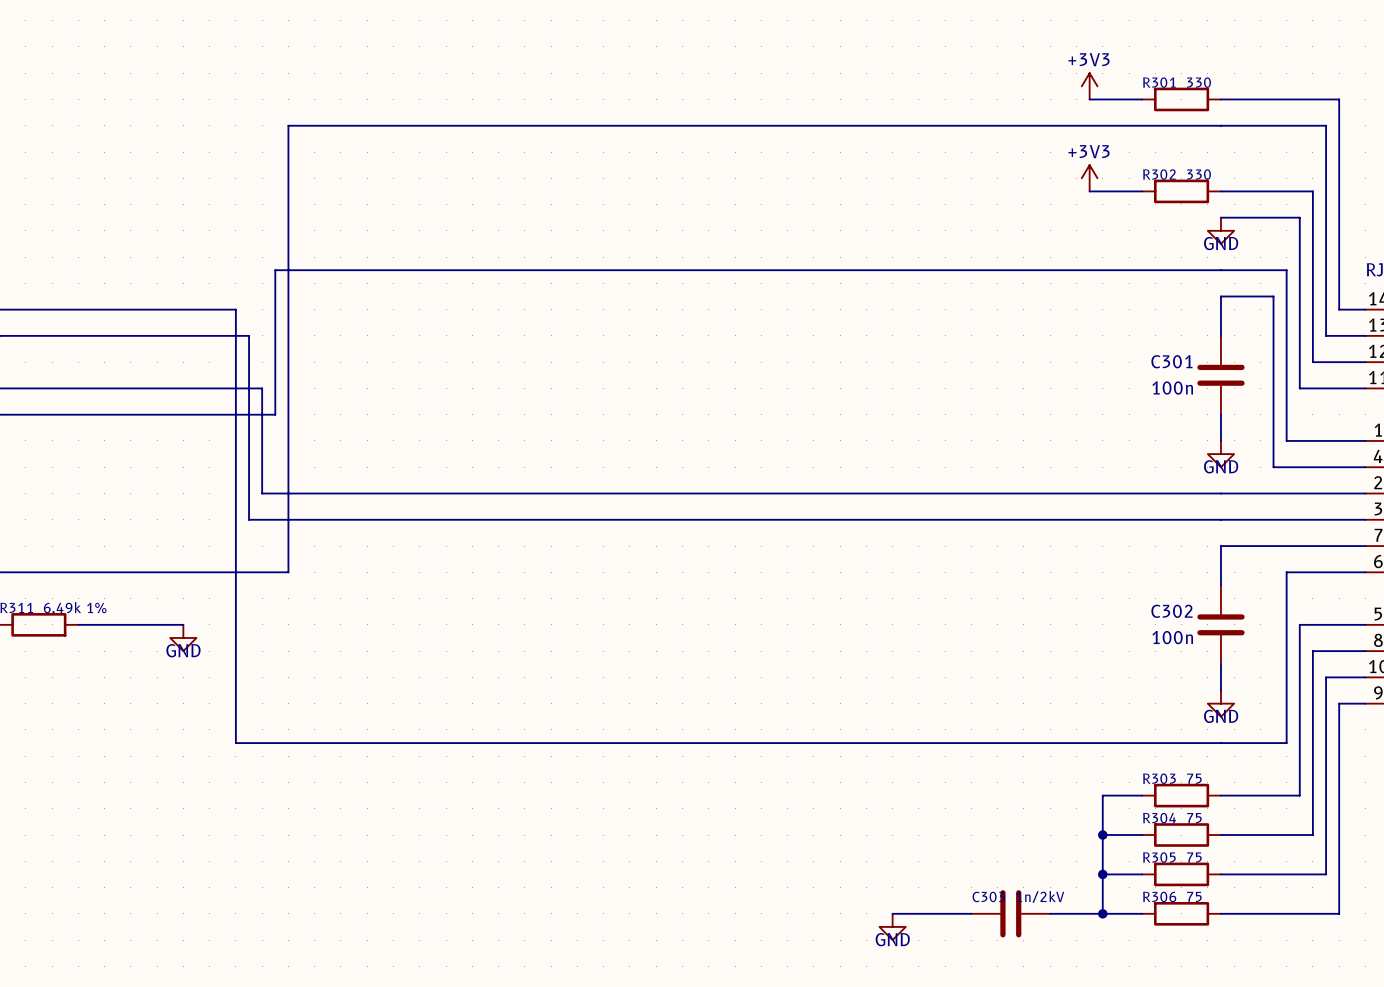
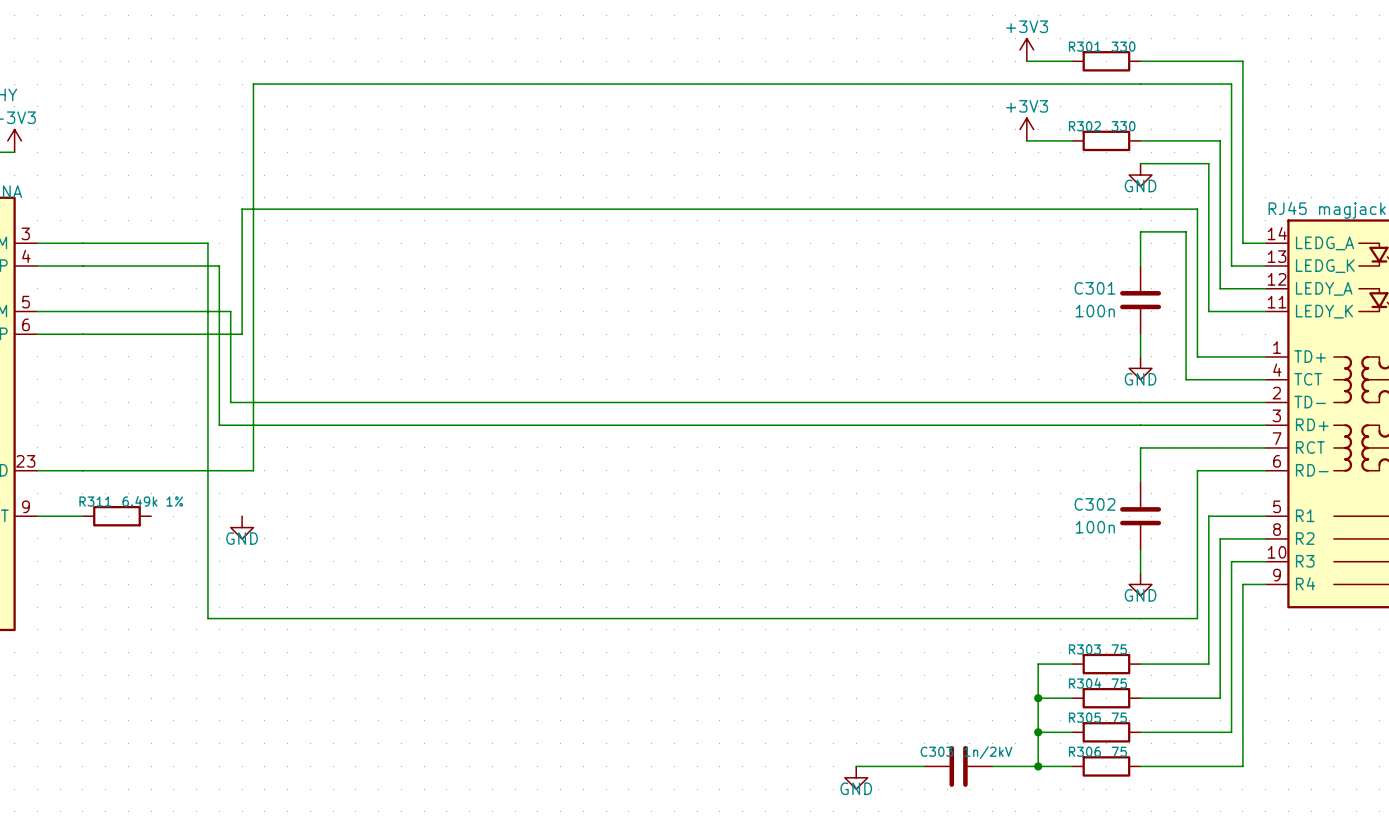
wire: (288, 125) (288, 572) (196, 572) -> (333, 84) (253, 84) (253, 470)
wire: (275, 270) (275, 414) (183, 414) -> (321, 209) (242, 209) (242, 334)
wire: (143, 309) (235, 309) (235, 743) -> (207, 243) (207, 618) (287, 618)
wire: (157, 335) (249, 335) (249, 519) -> (219, 266) (219, 425) (298, 425)
wire: (170, 388) (262, 388) (262, 493) -> (230, 311) (230, 402) (310, 402)
wire: (78, 624) (183, 624) -> none

